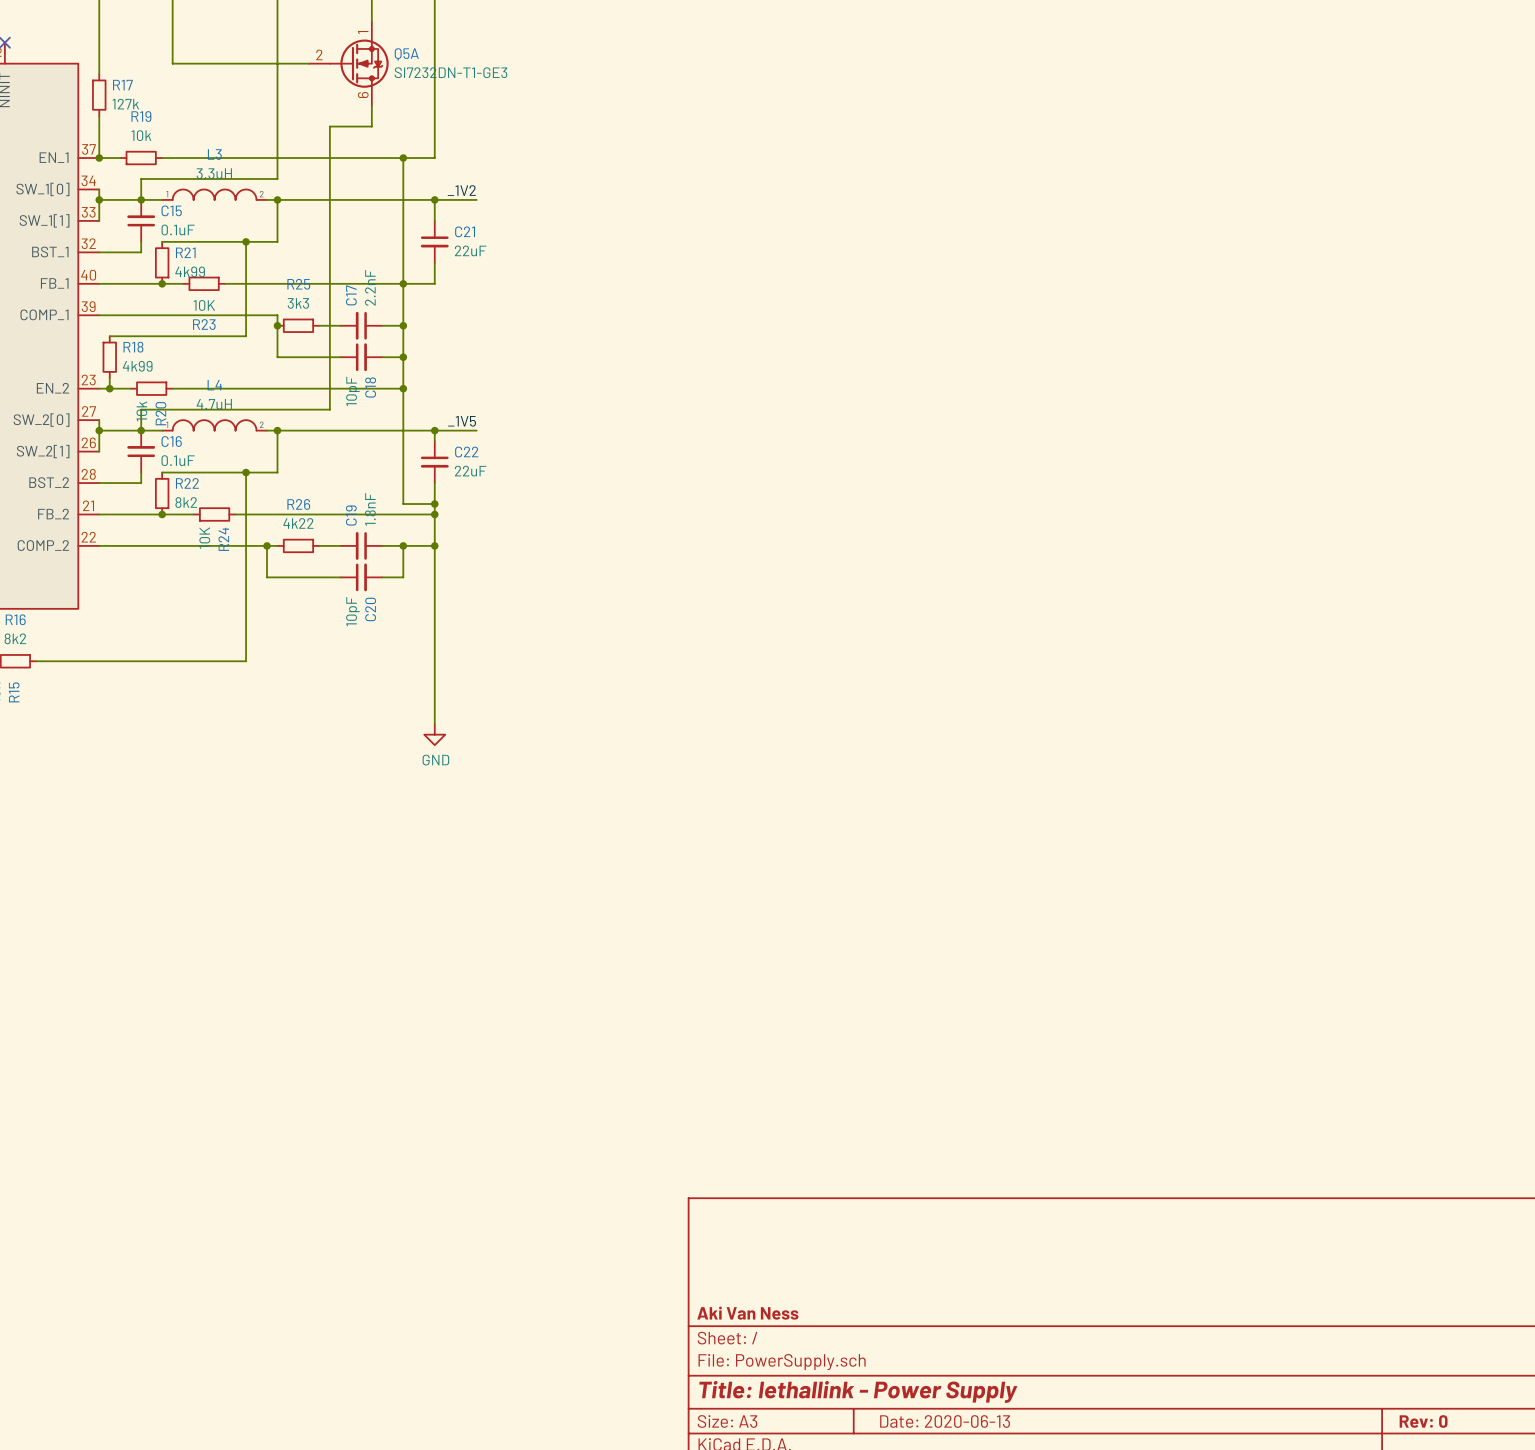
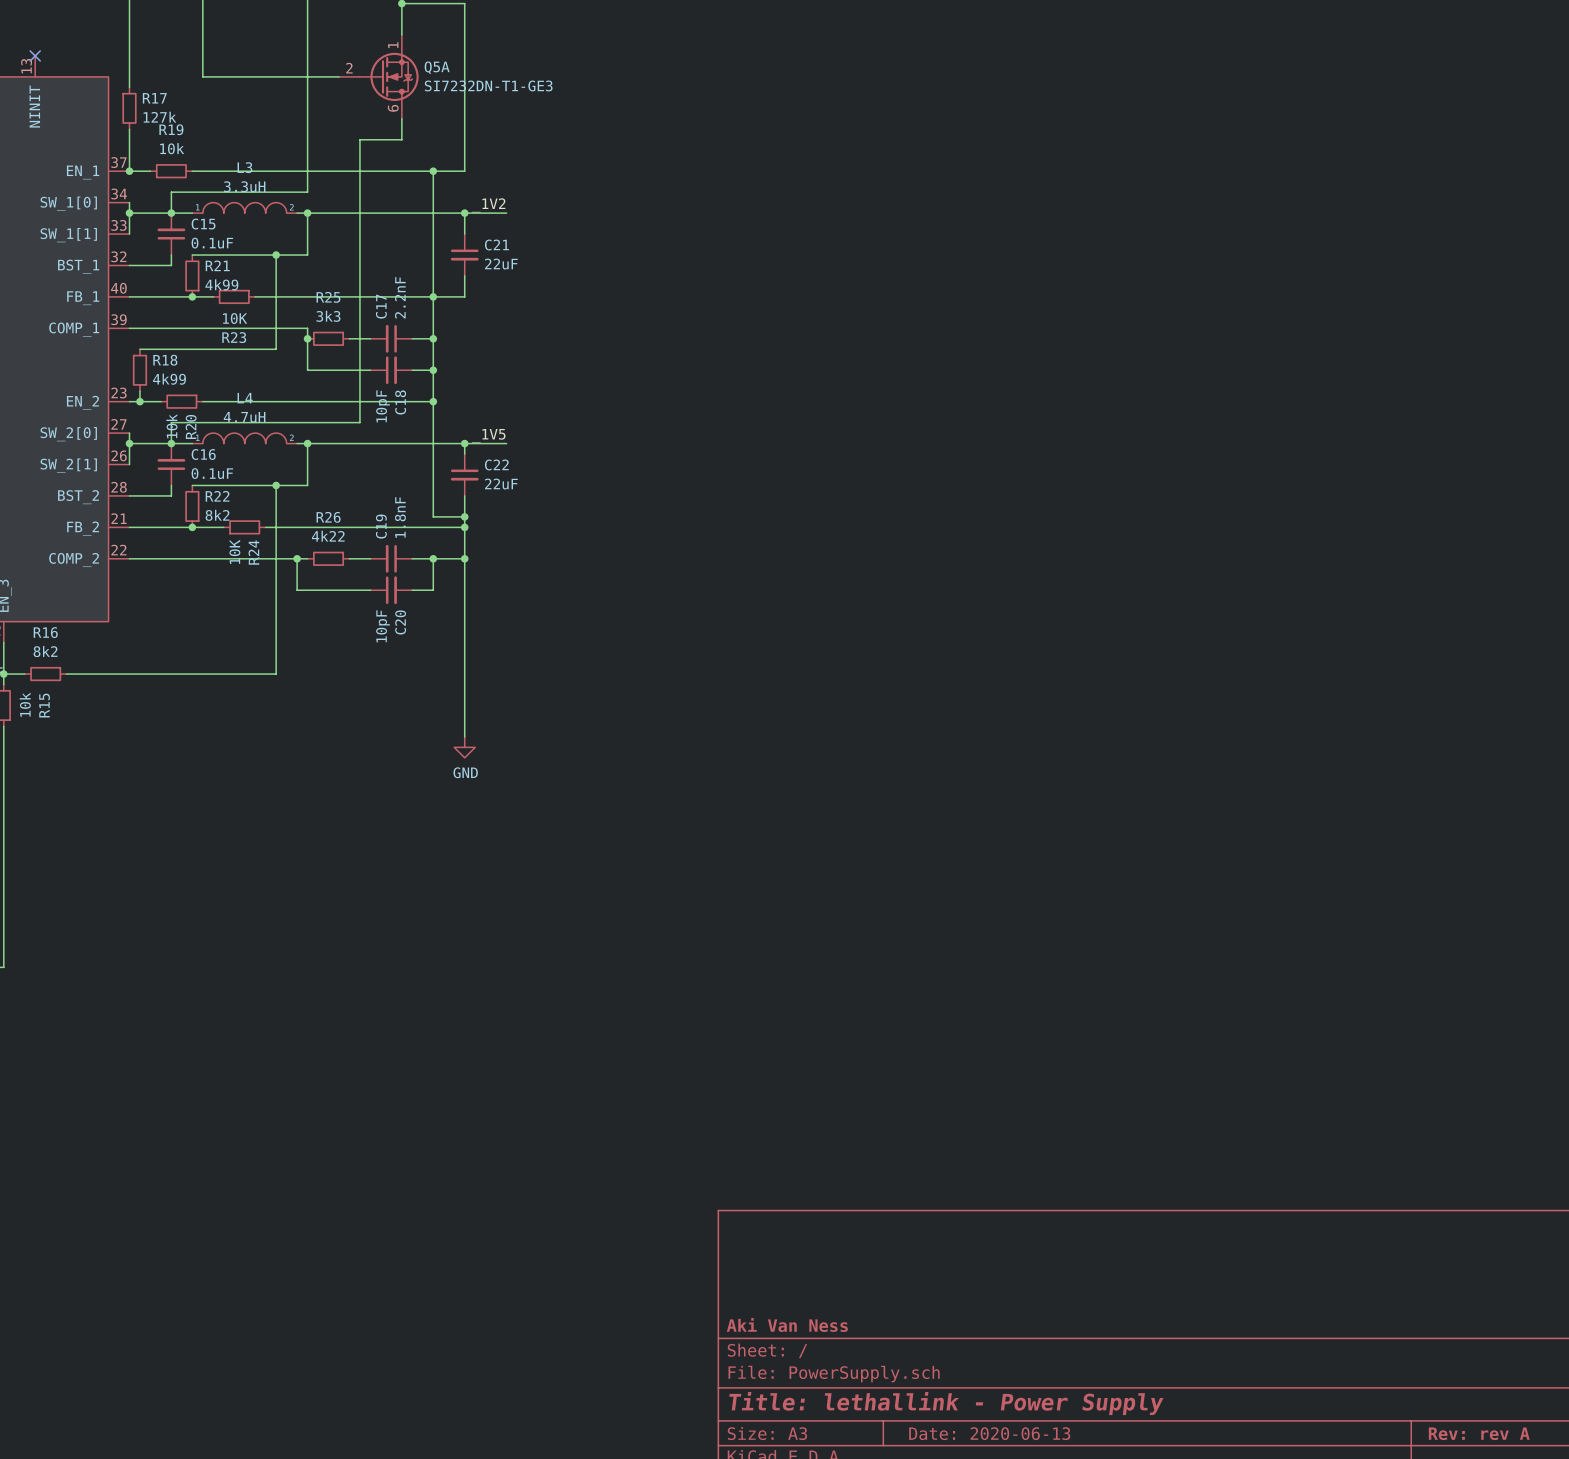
title block: Rev: 0 (1423, 1421) -> Rev: rev A (1479, 1433)

